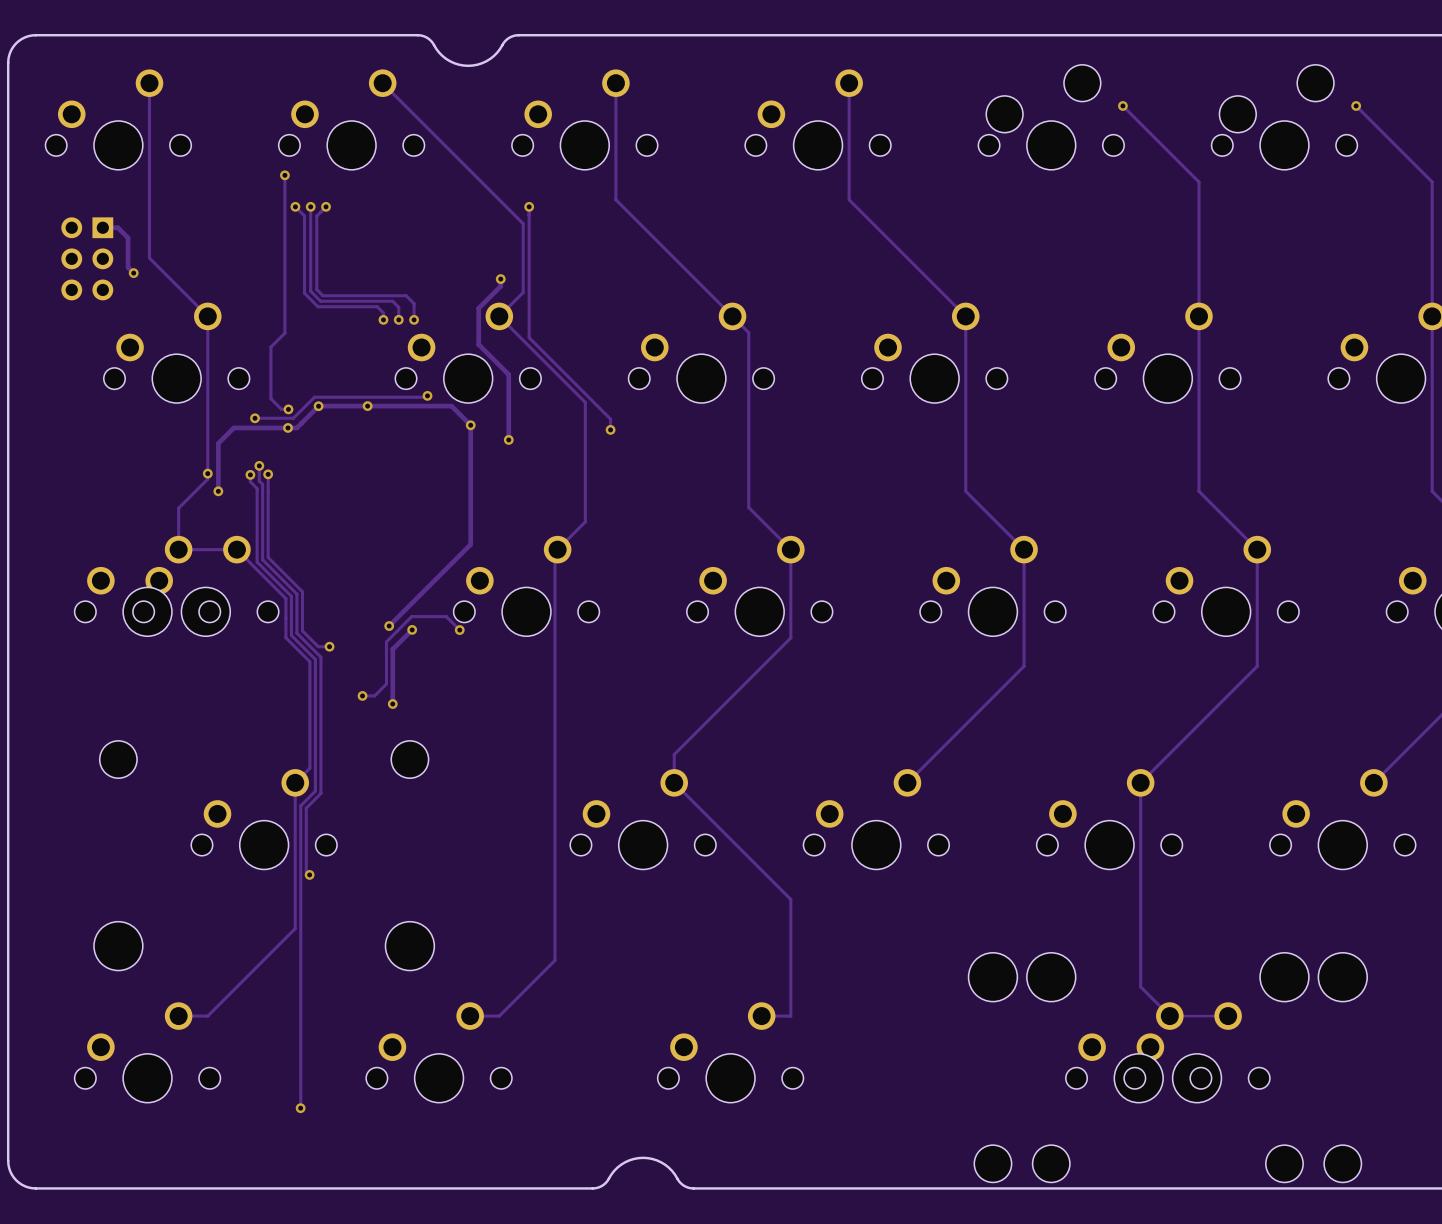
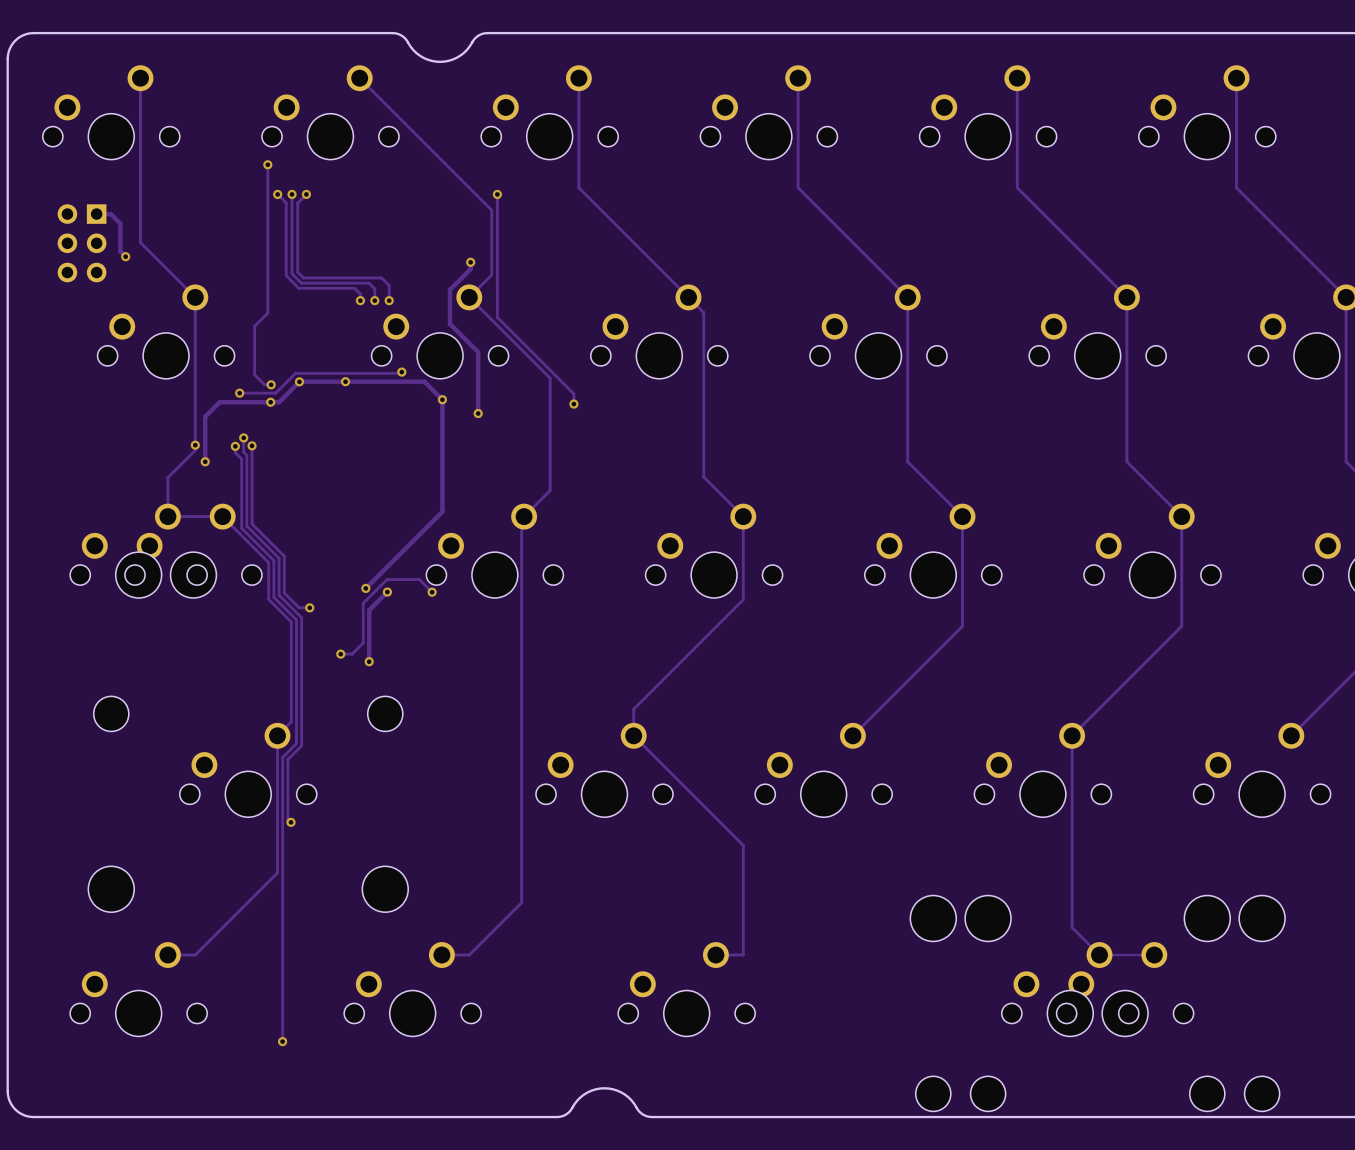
part footprint: [978, 64, 1125, 170] -> [919, 65, 1057, 160]
part footprint: [1211, 64, 1358, 170] -> [1138, 65, 1276, 160]
track: (1122, 105) (1198, 182) (1198, 316) -> (1017, 78) (1017, 187) (1126, 297)
via: (1122, 105) -> none
track: (1356, 105) (1432, 182) (1432, 316) -> (1236, 78) (1236, 187) (1346, 297)
via: (1356, 105) -> none

